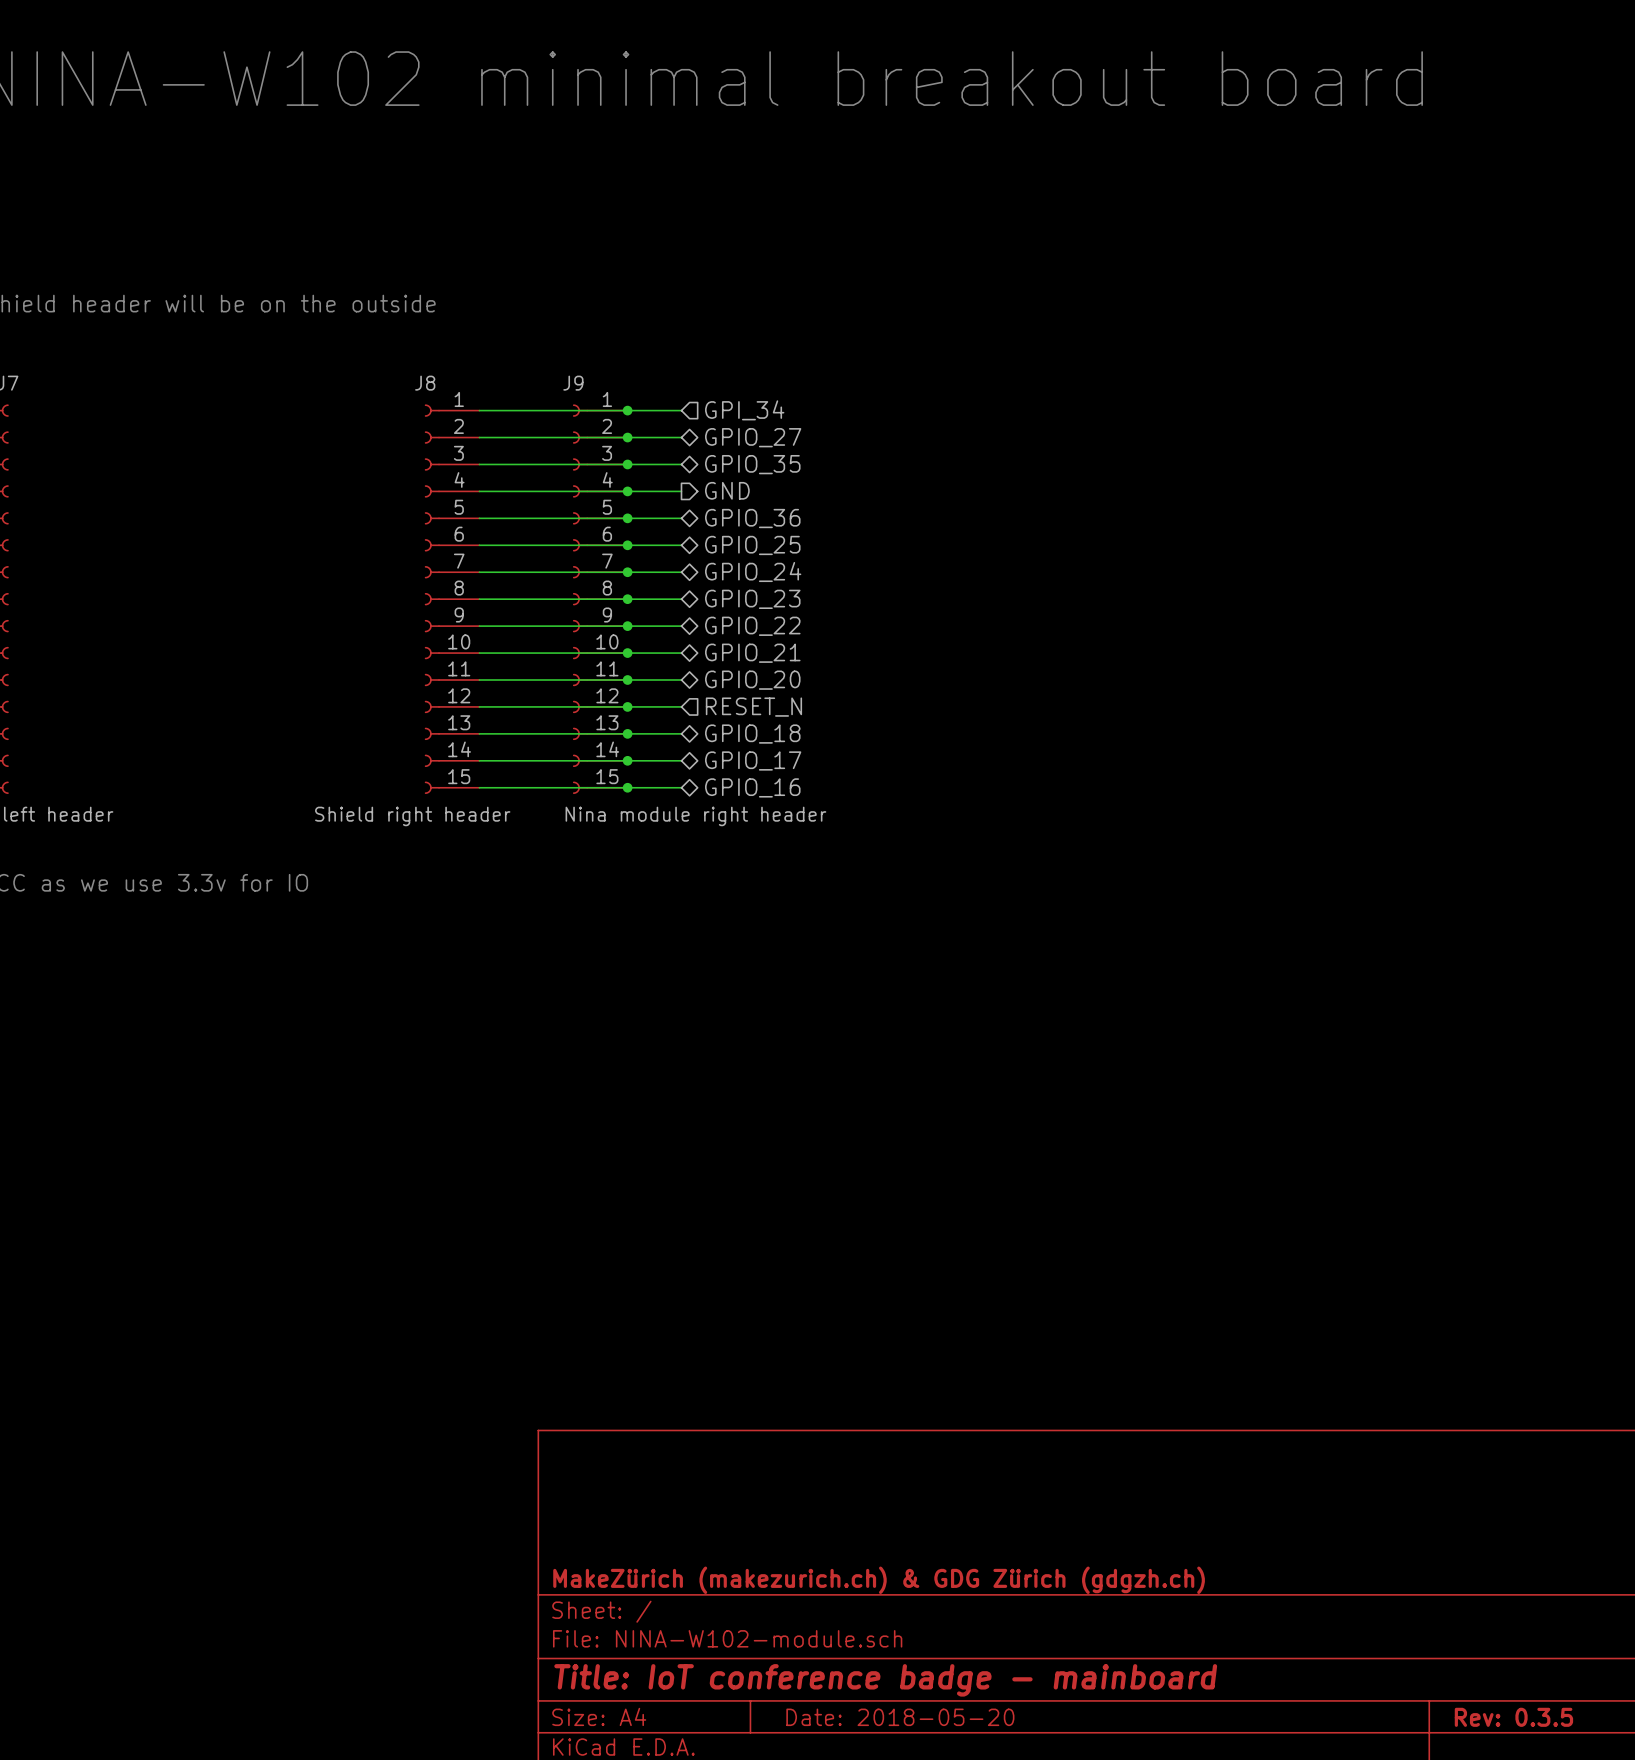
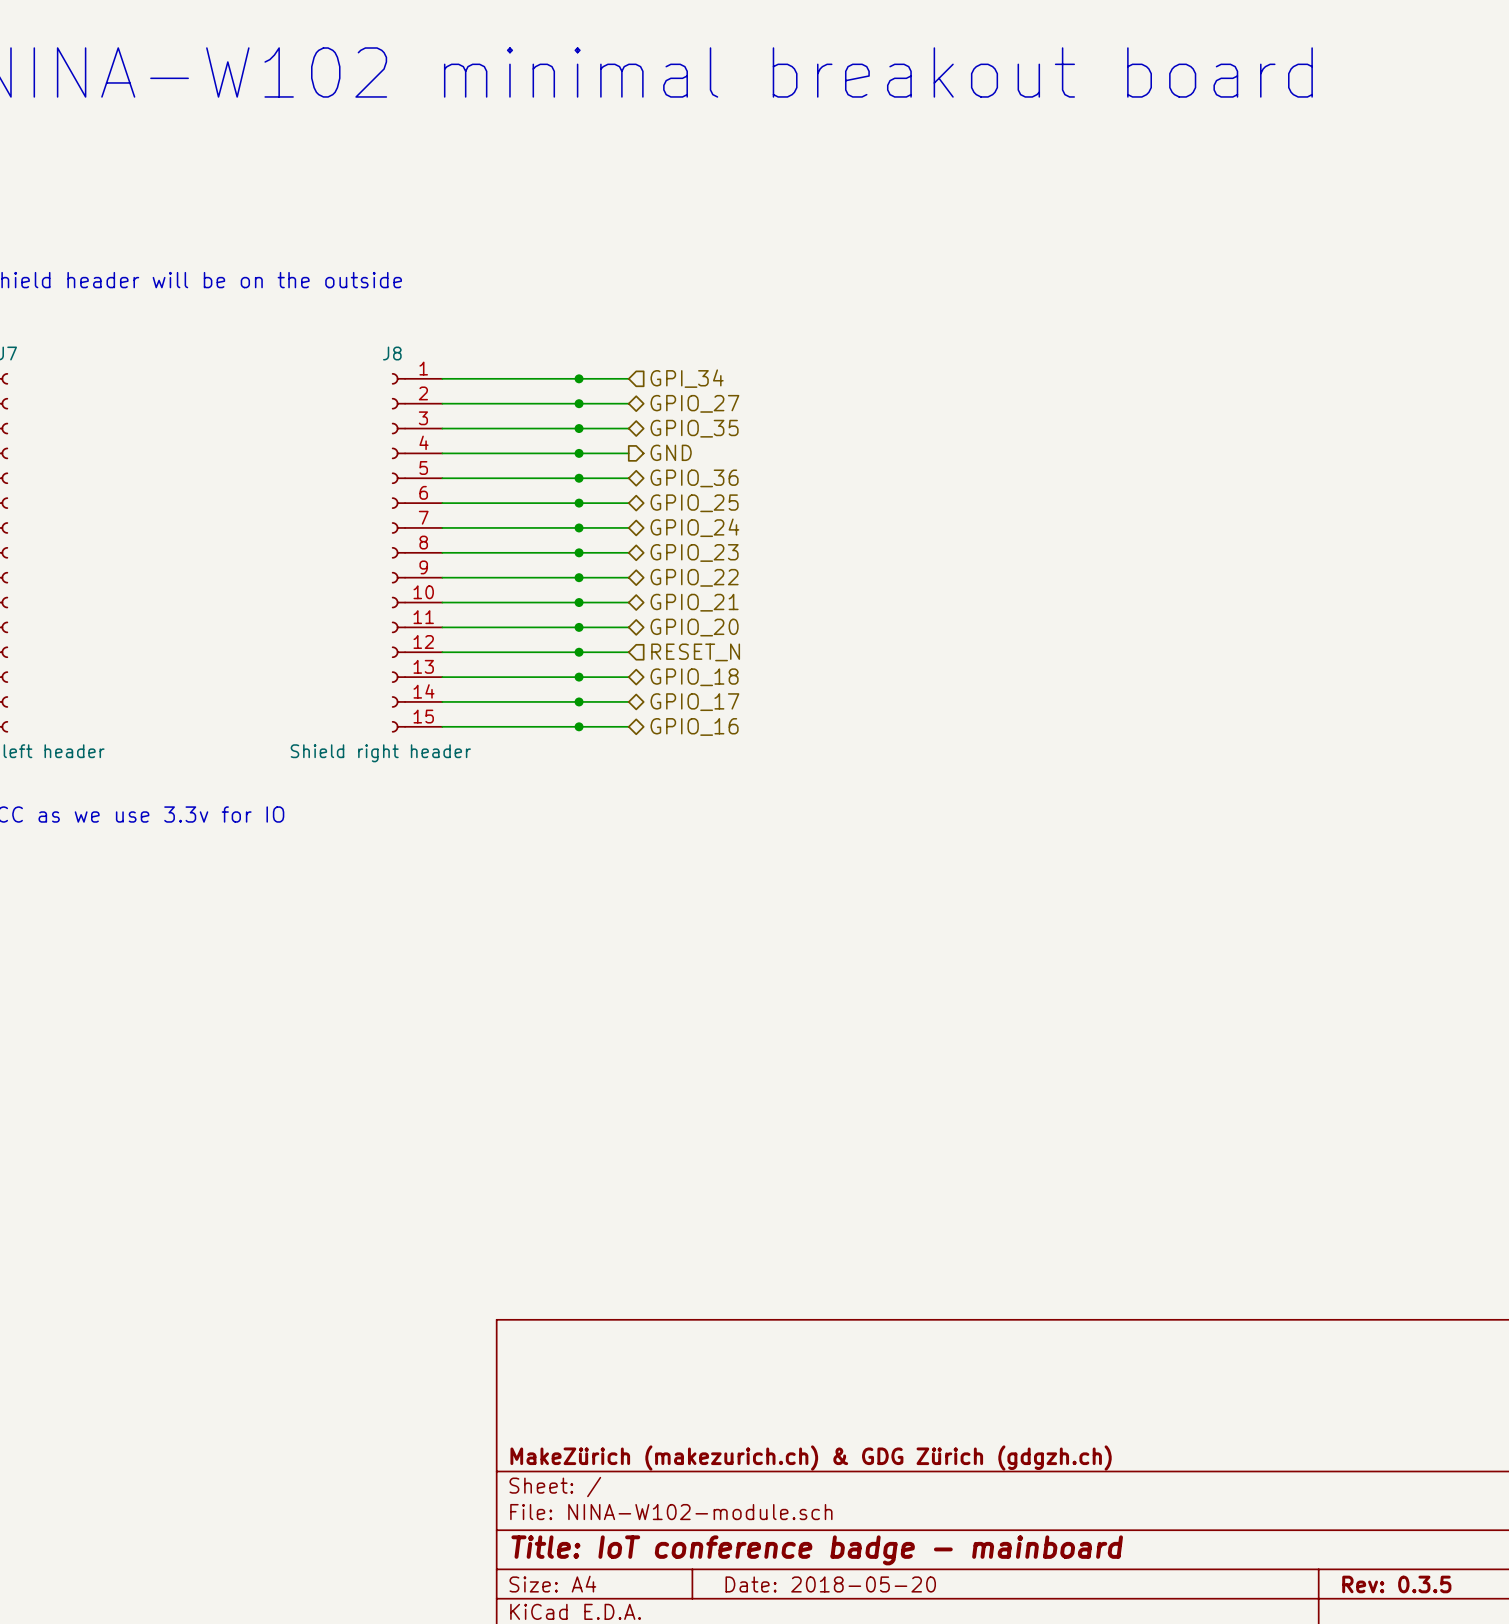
J9: Nina module right header (600, 599) -> none

